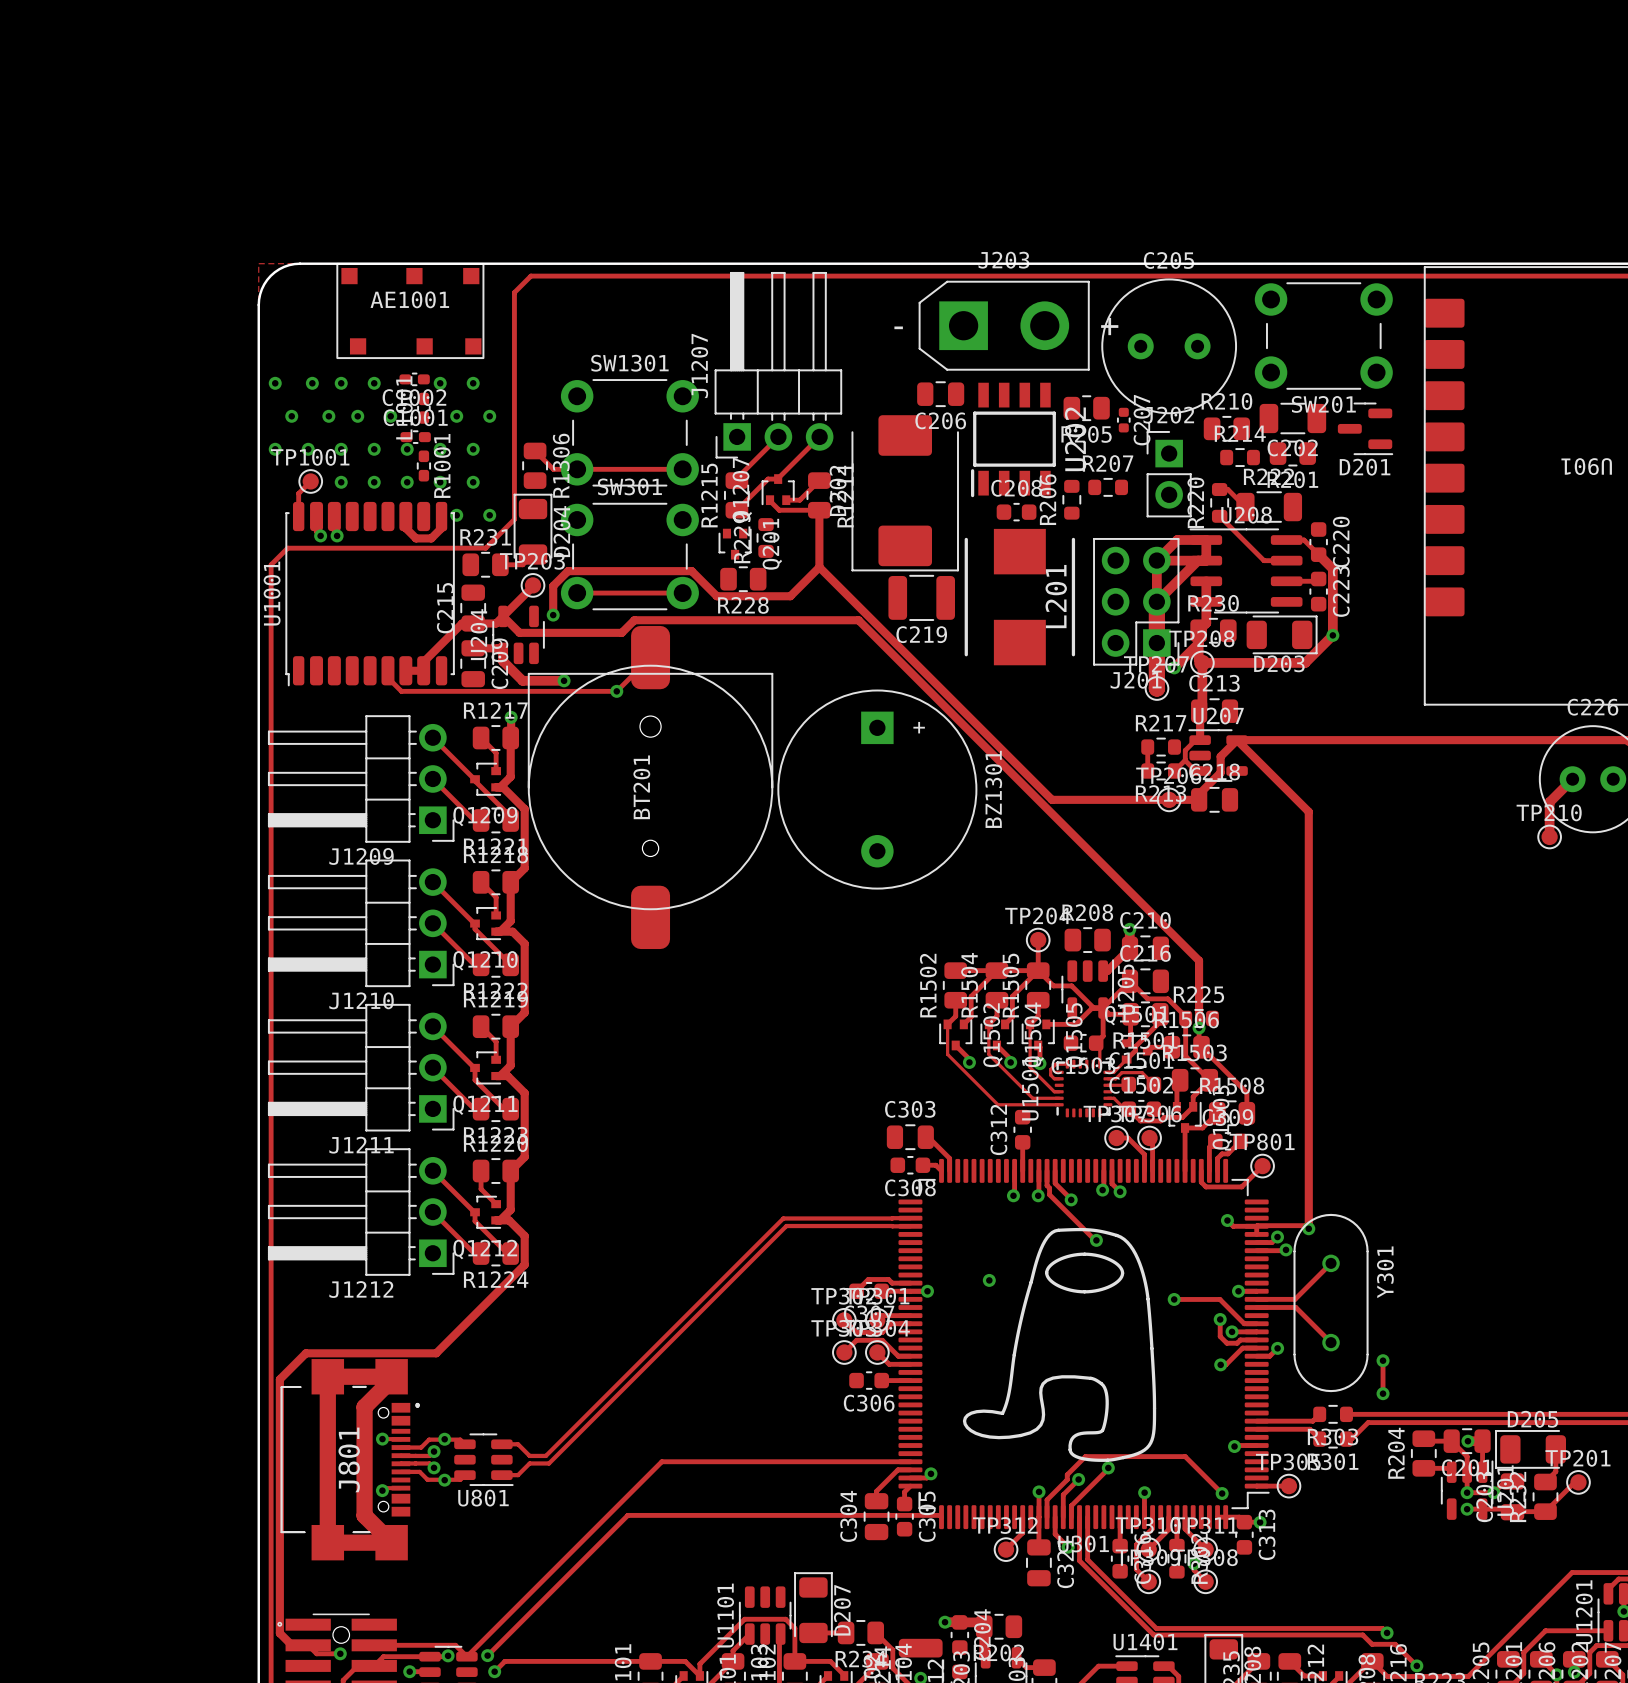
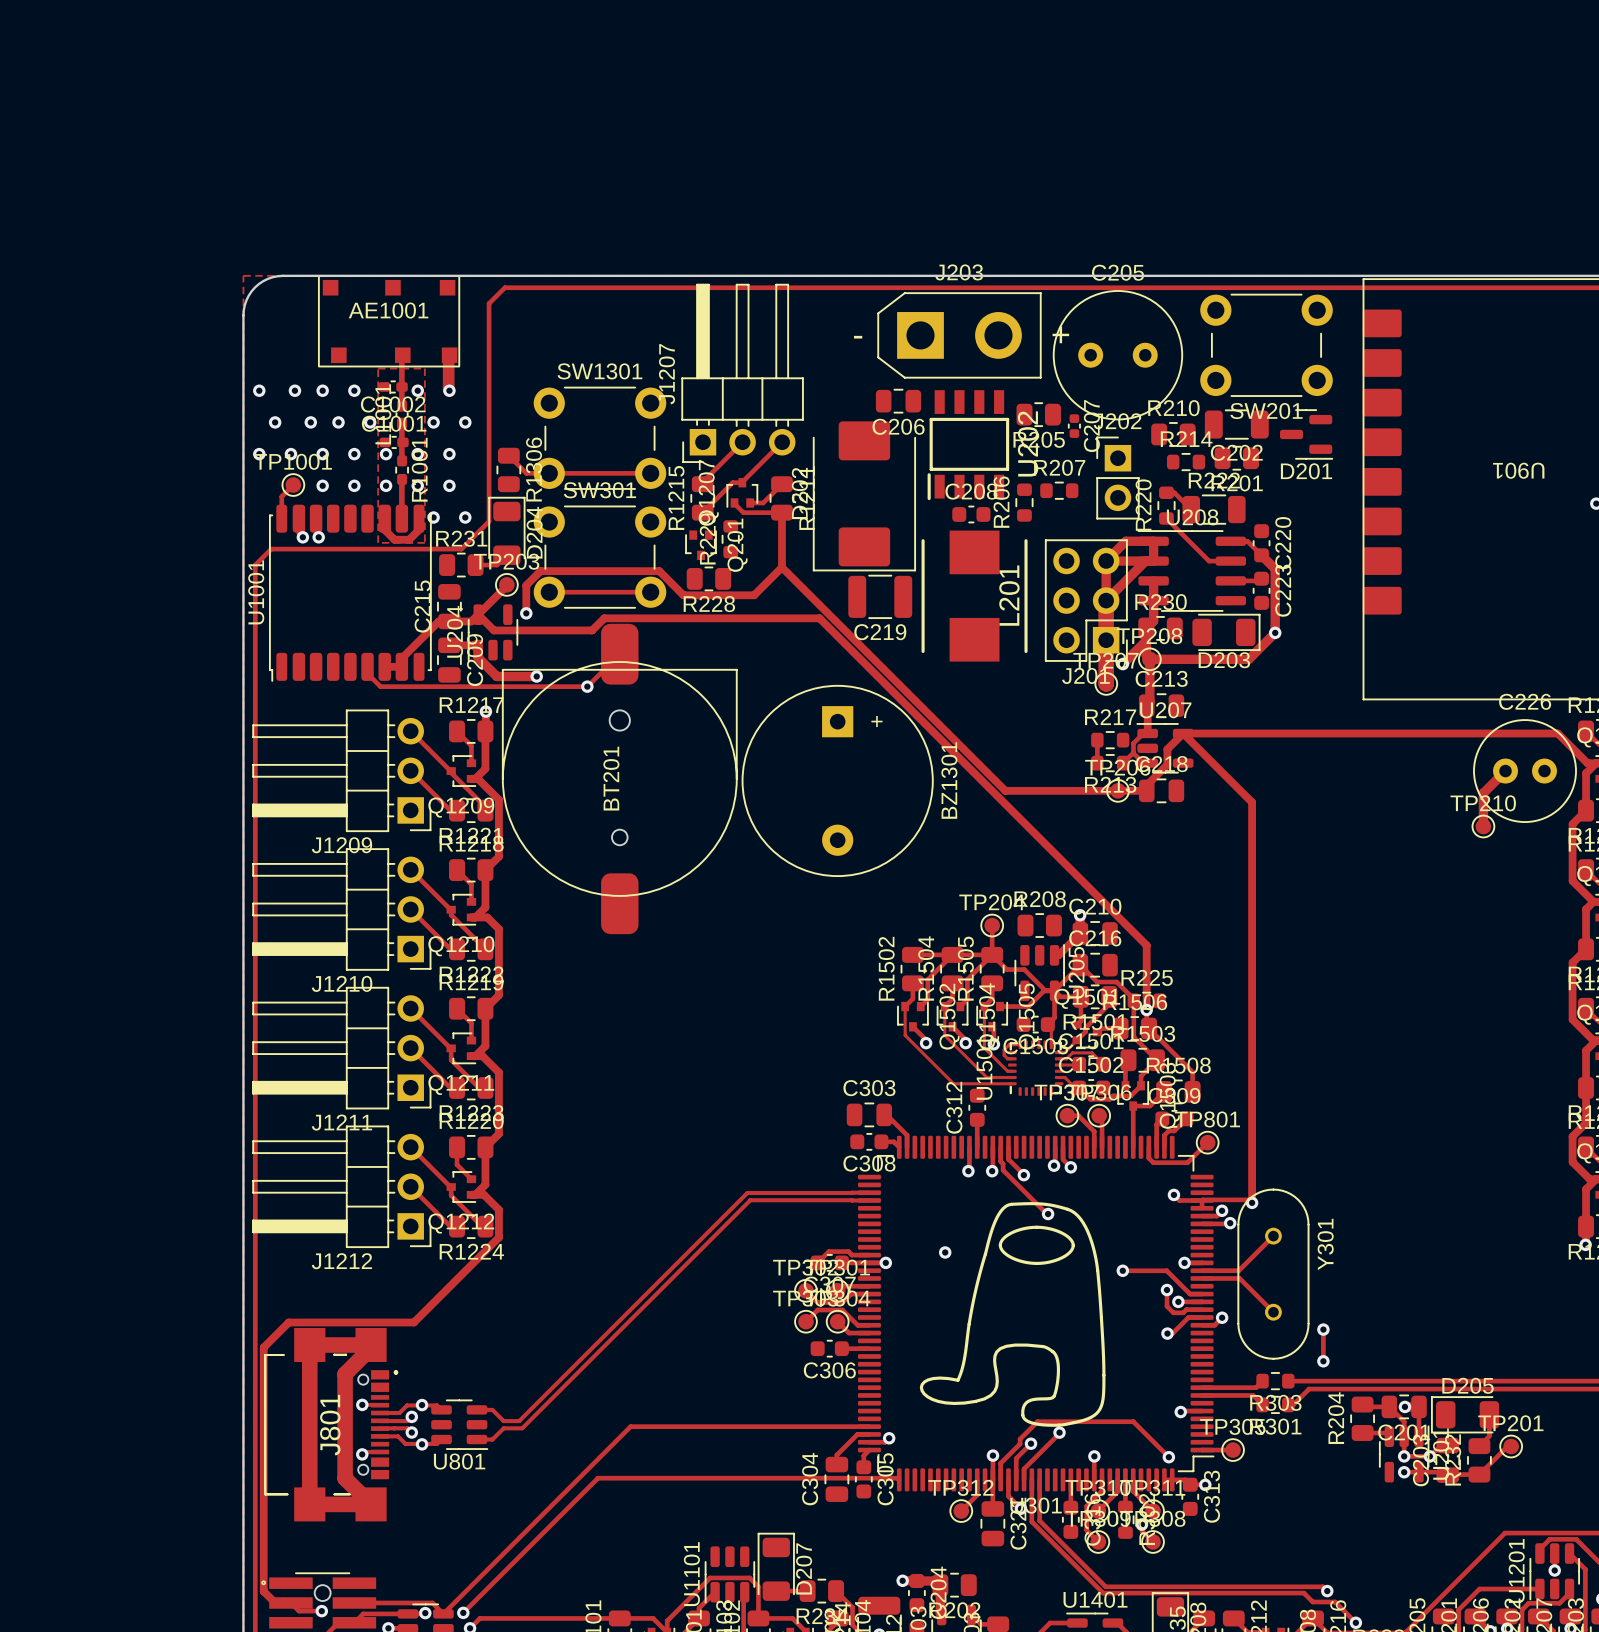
track: none -> (401, 355) (401, 405)
track: none -> (448, 355) (449, 390)
zone outline: none -> (378, 368) (378, 542) (424, 542) (424, 368) (378, 368)
track: none -> (401, 423) (401, 460)
track: none -> (401, 479) (401, 518)

